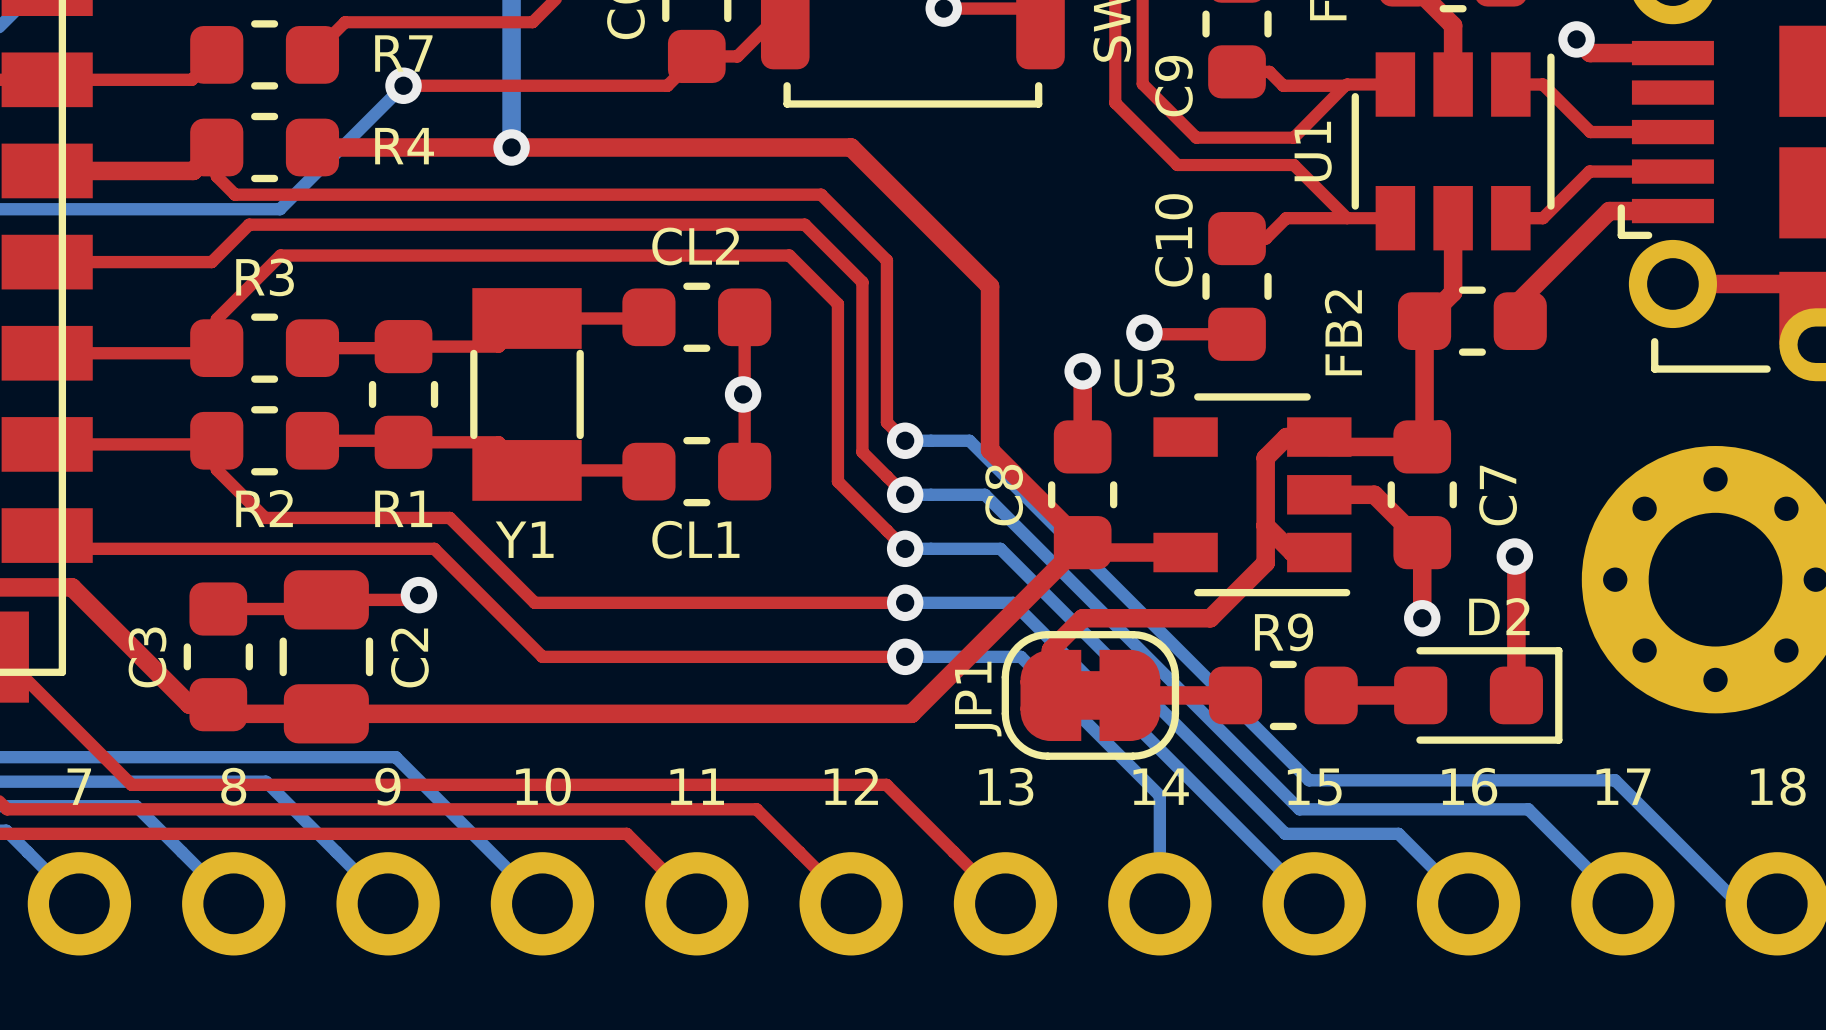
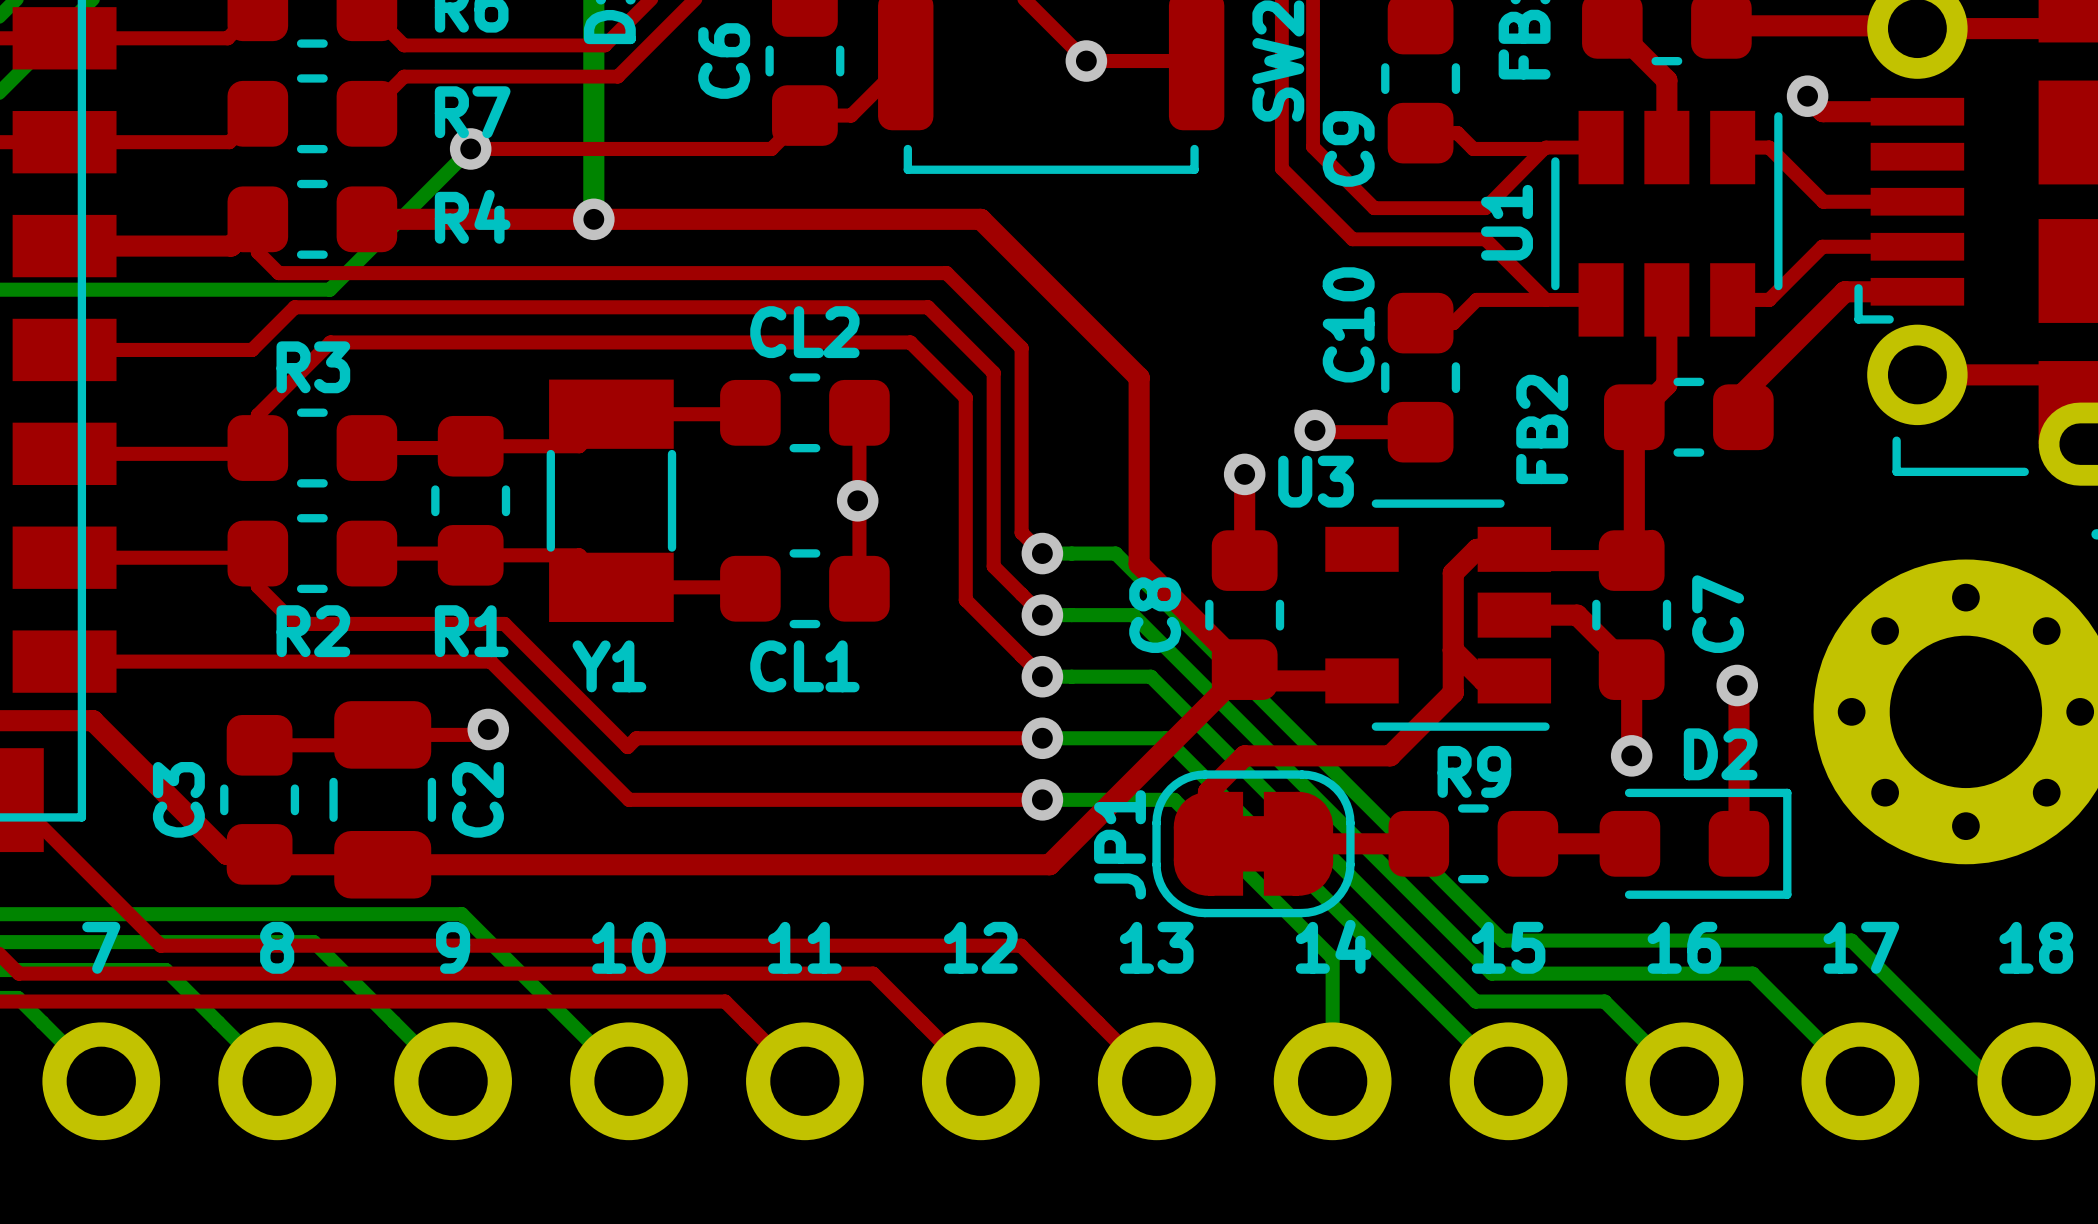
top track: (249, 502) (265, 517) (449, 517) (534, 602) (548, 602) -> (295, 623) (504, 623) (627, 747) (636, 738)
top track: (49, 535) (62, 548) (434, 548) -> (67, 661) (490, 661) (505, 676)

